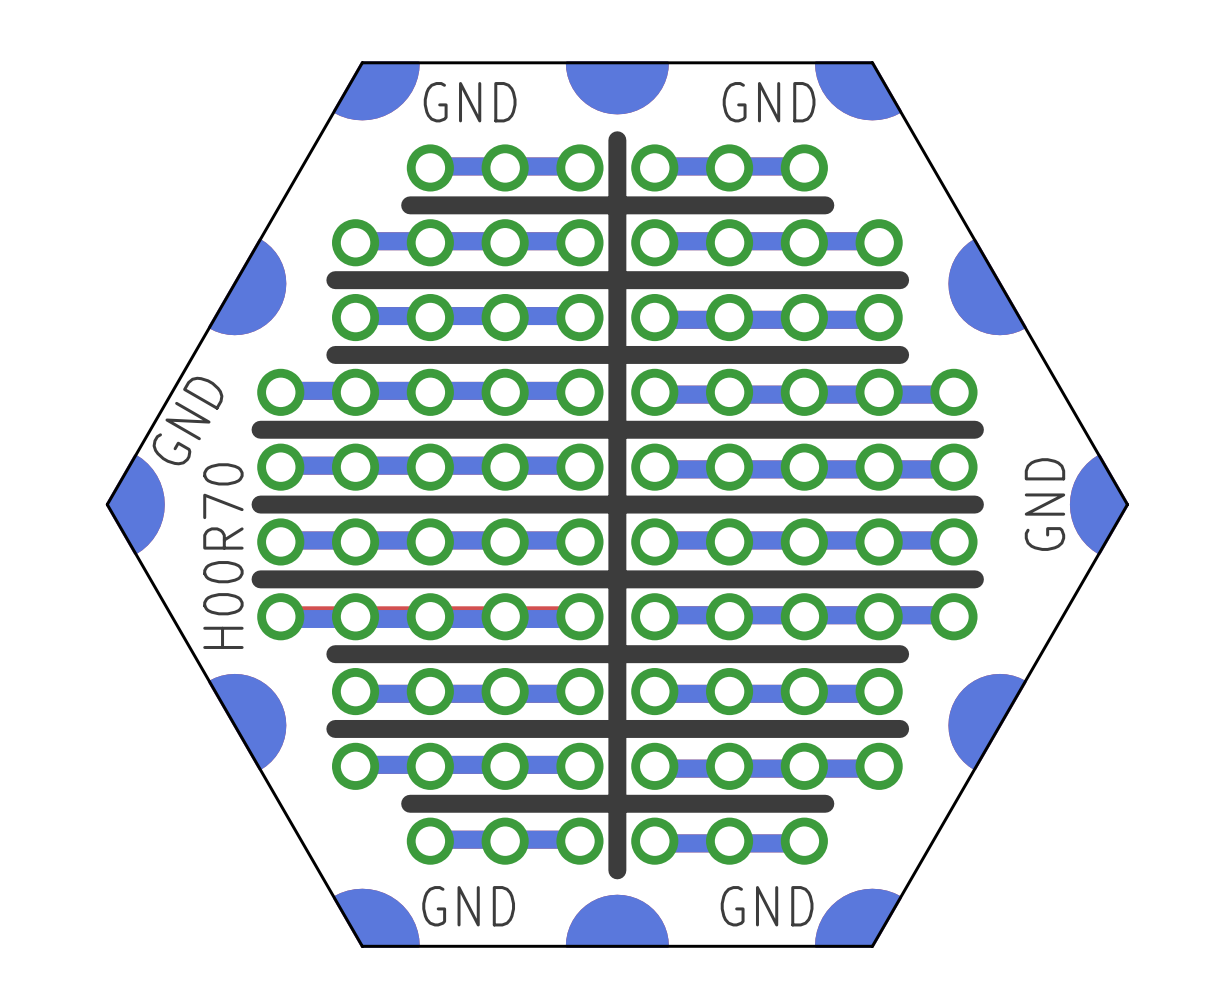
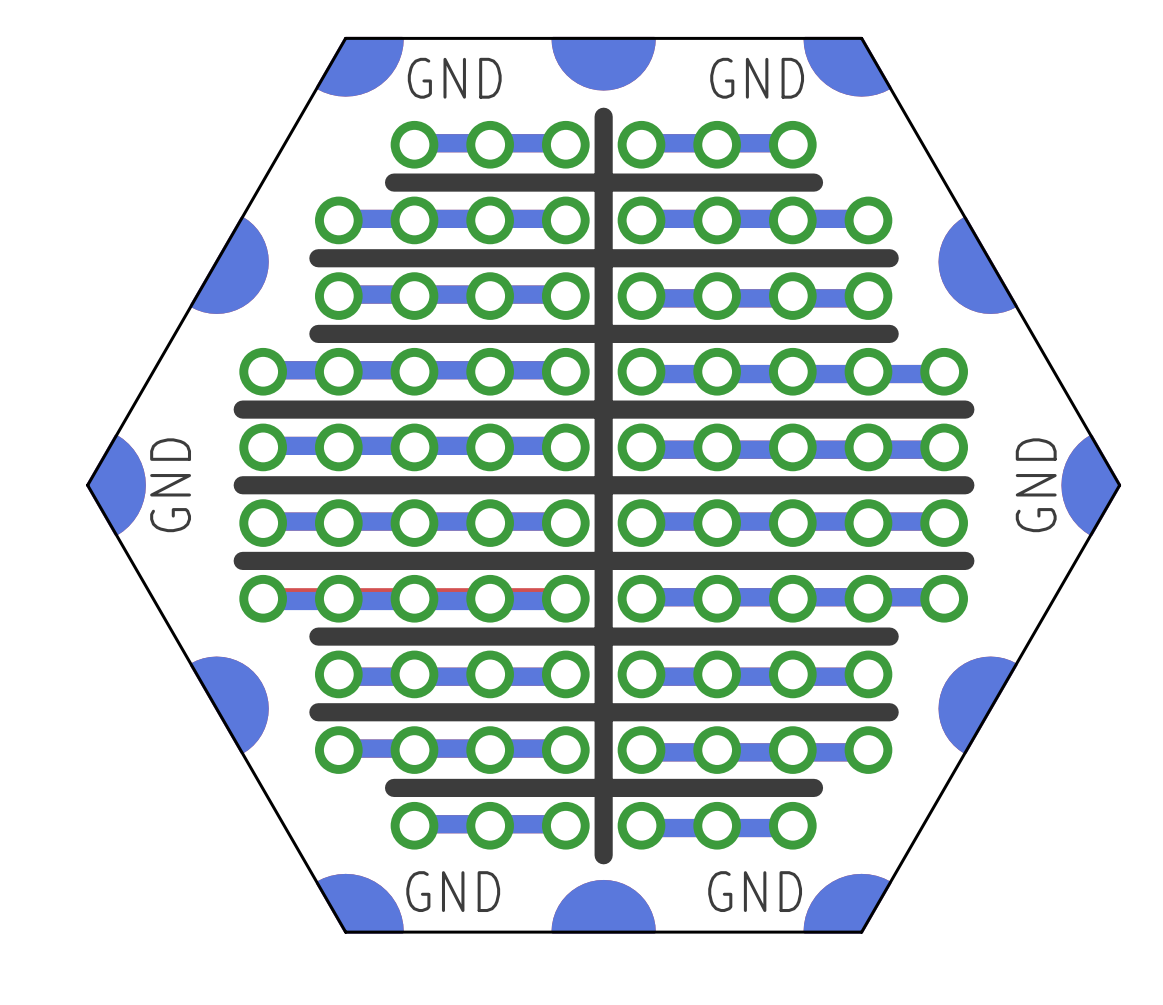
text rotation: 0° (187, 421) -> 30° counterclockwise (170, 485)
text: H00R70 (223, 556) -> none

